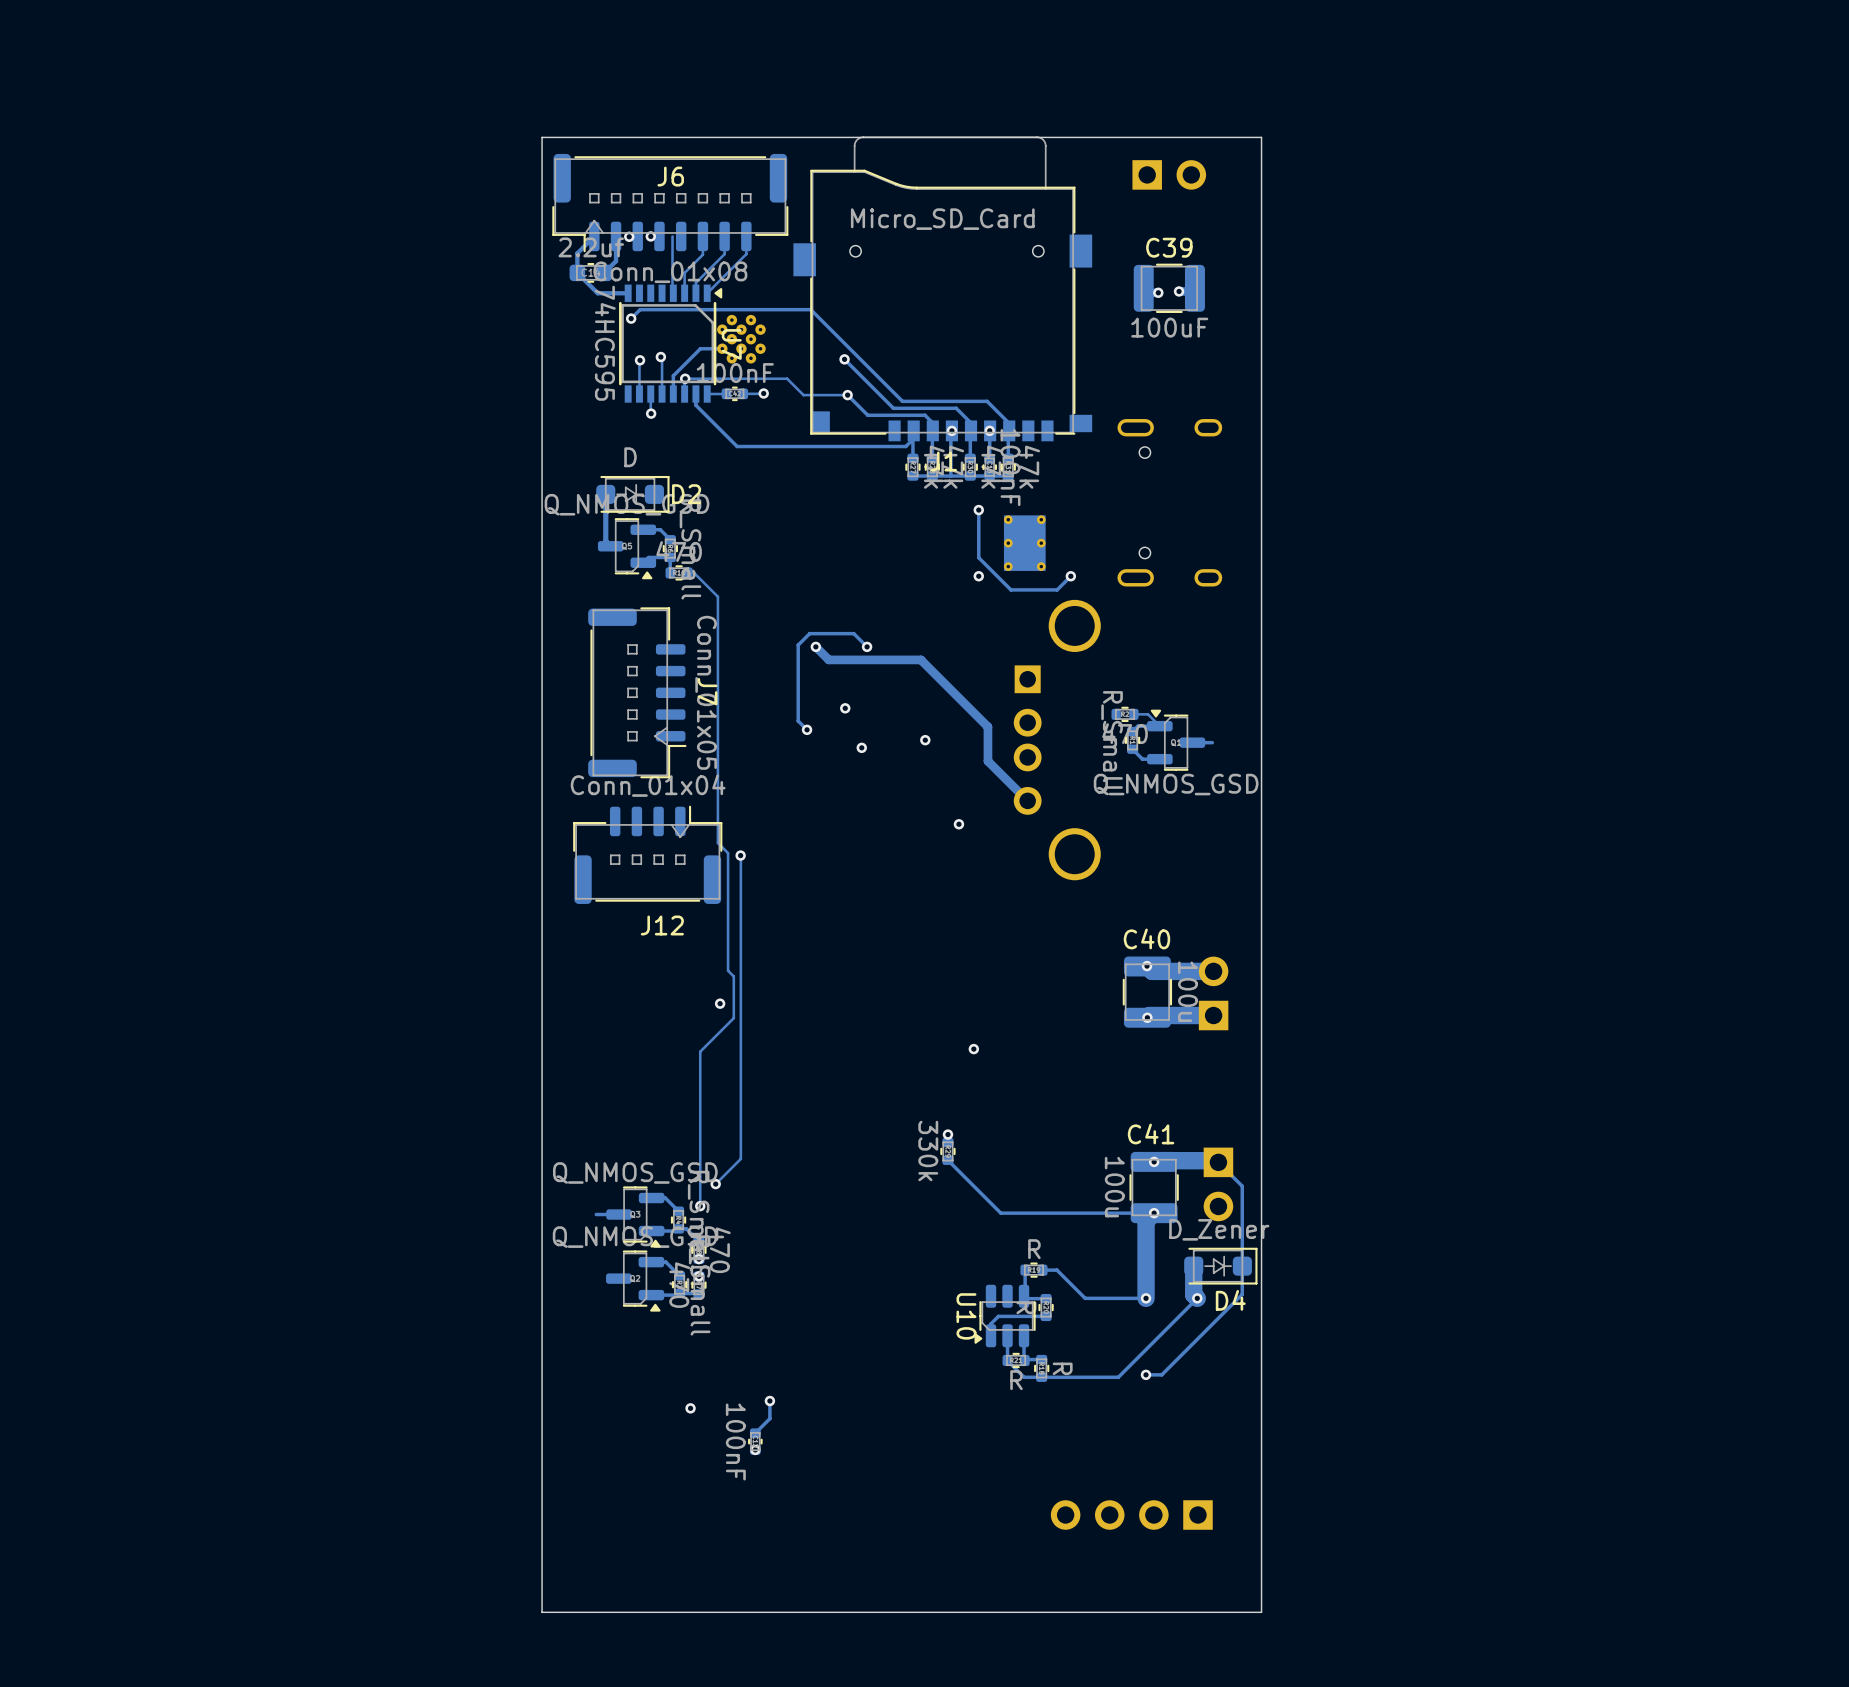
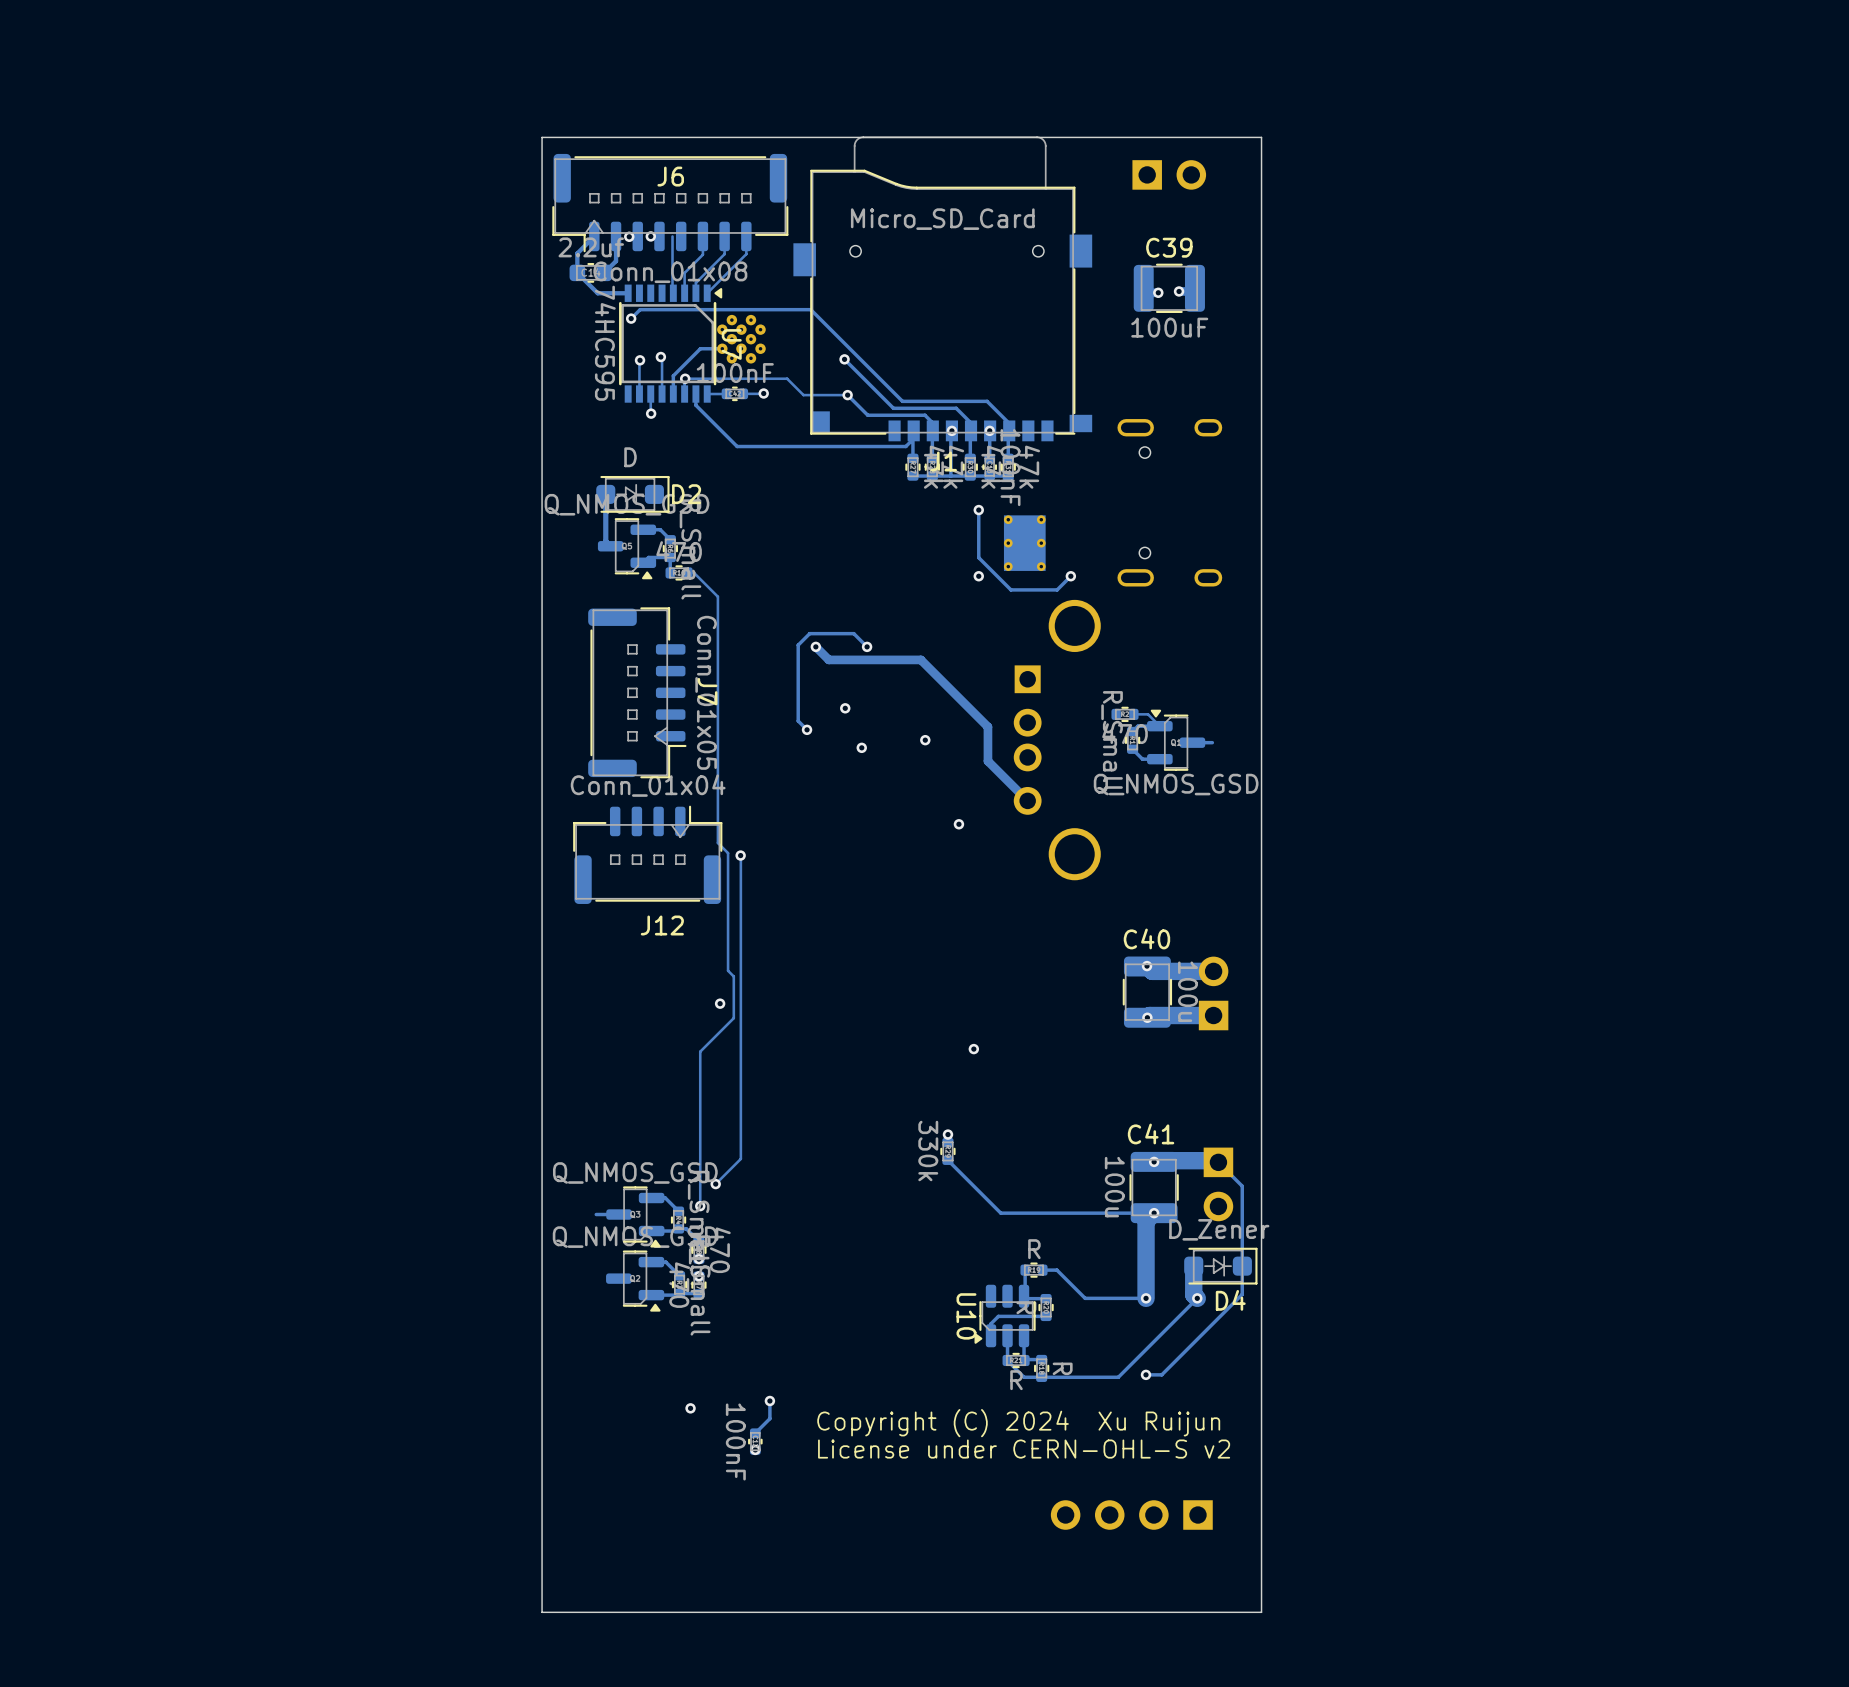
text: none -> Copyright (C) 2024 Xu Ruijun (1018, 1423)
text: none -> License under CERN-OHL-S v2 (1024, 1449)

